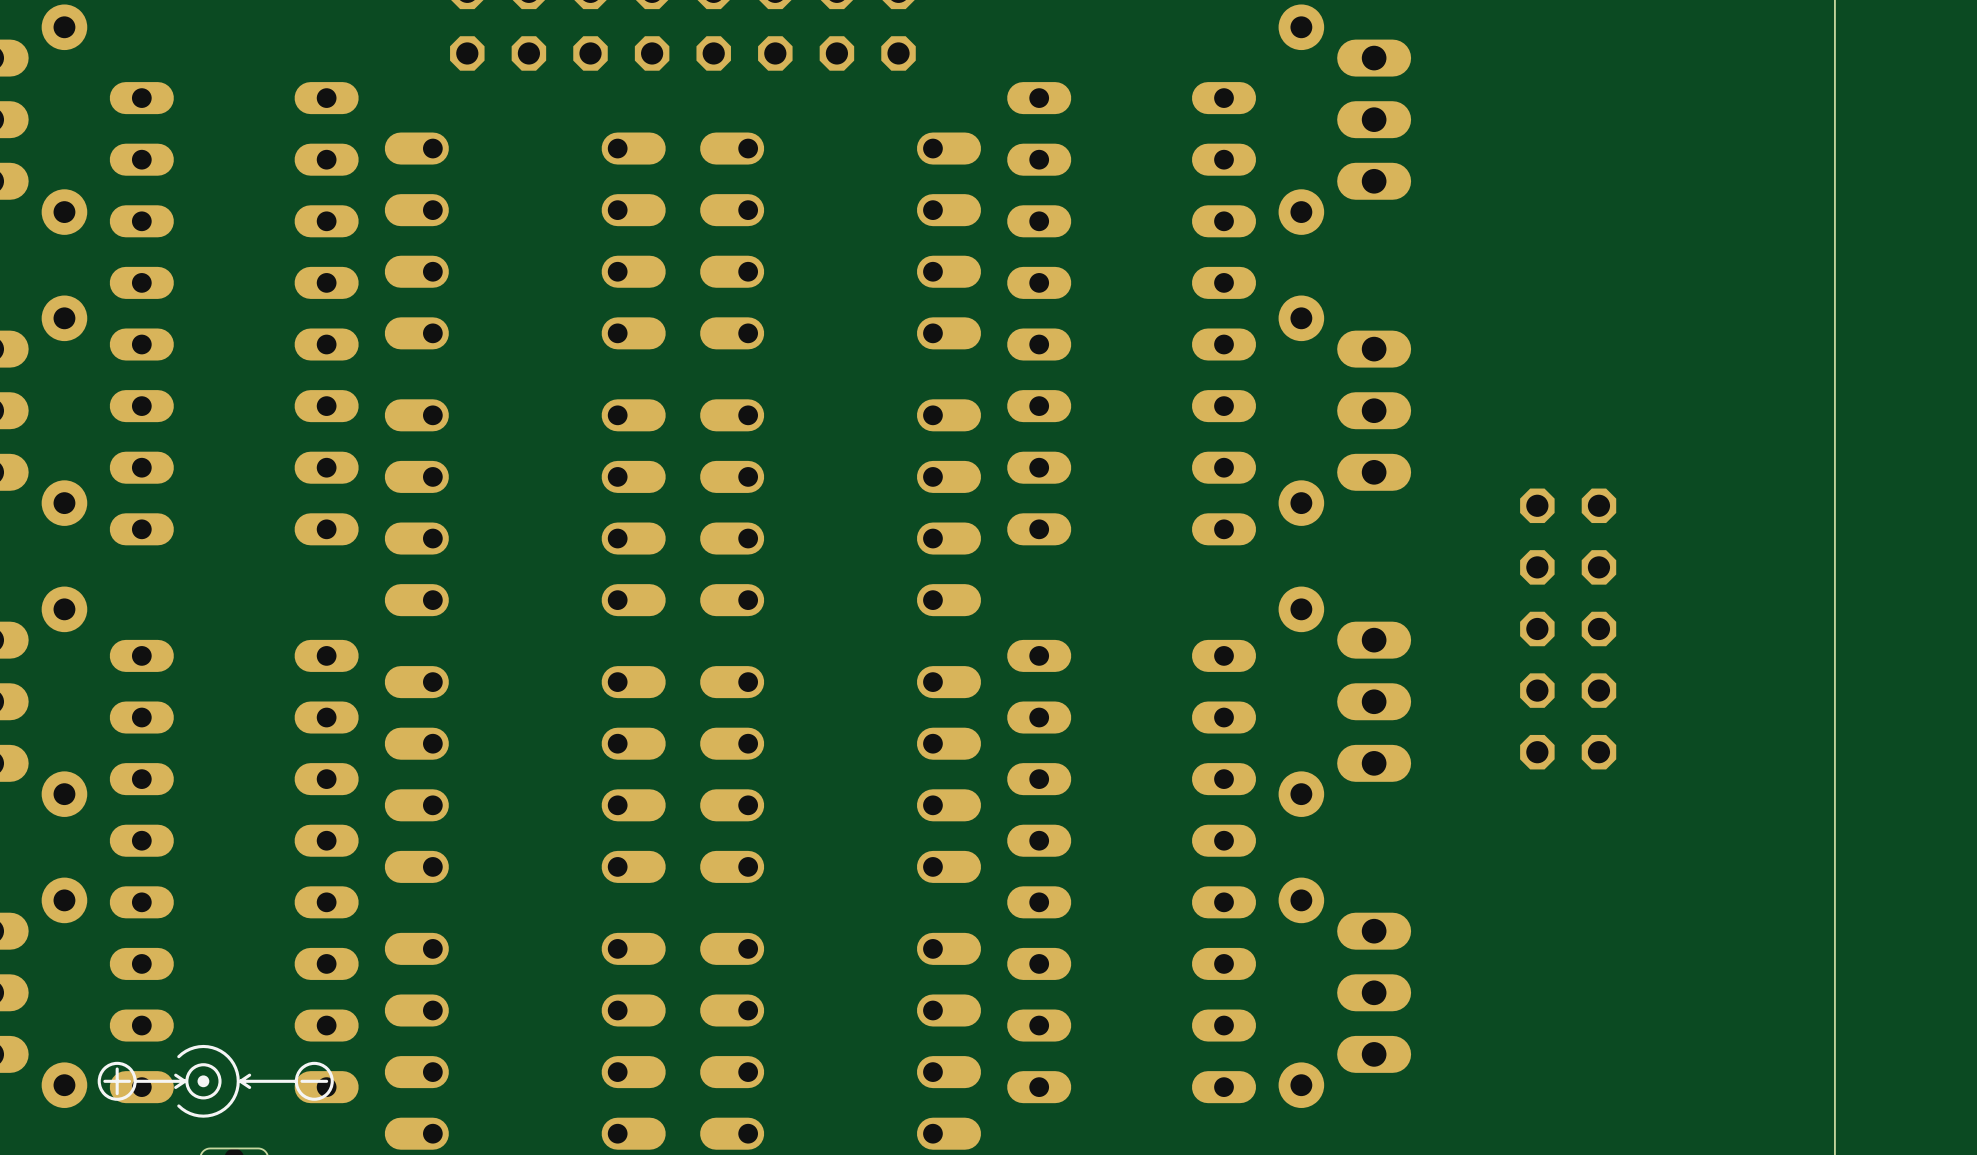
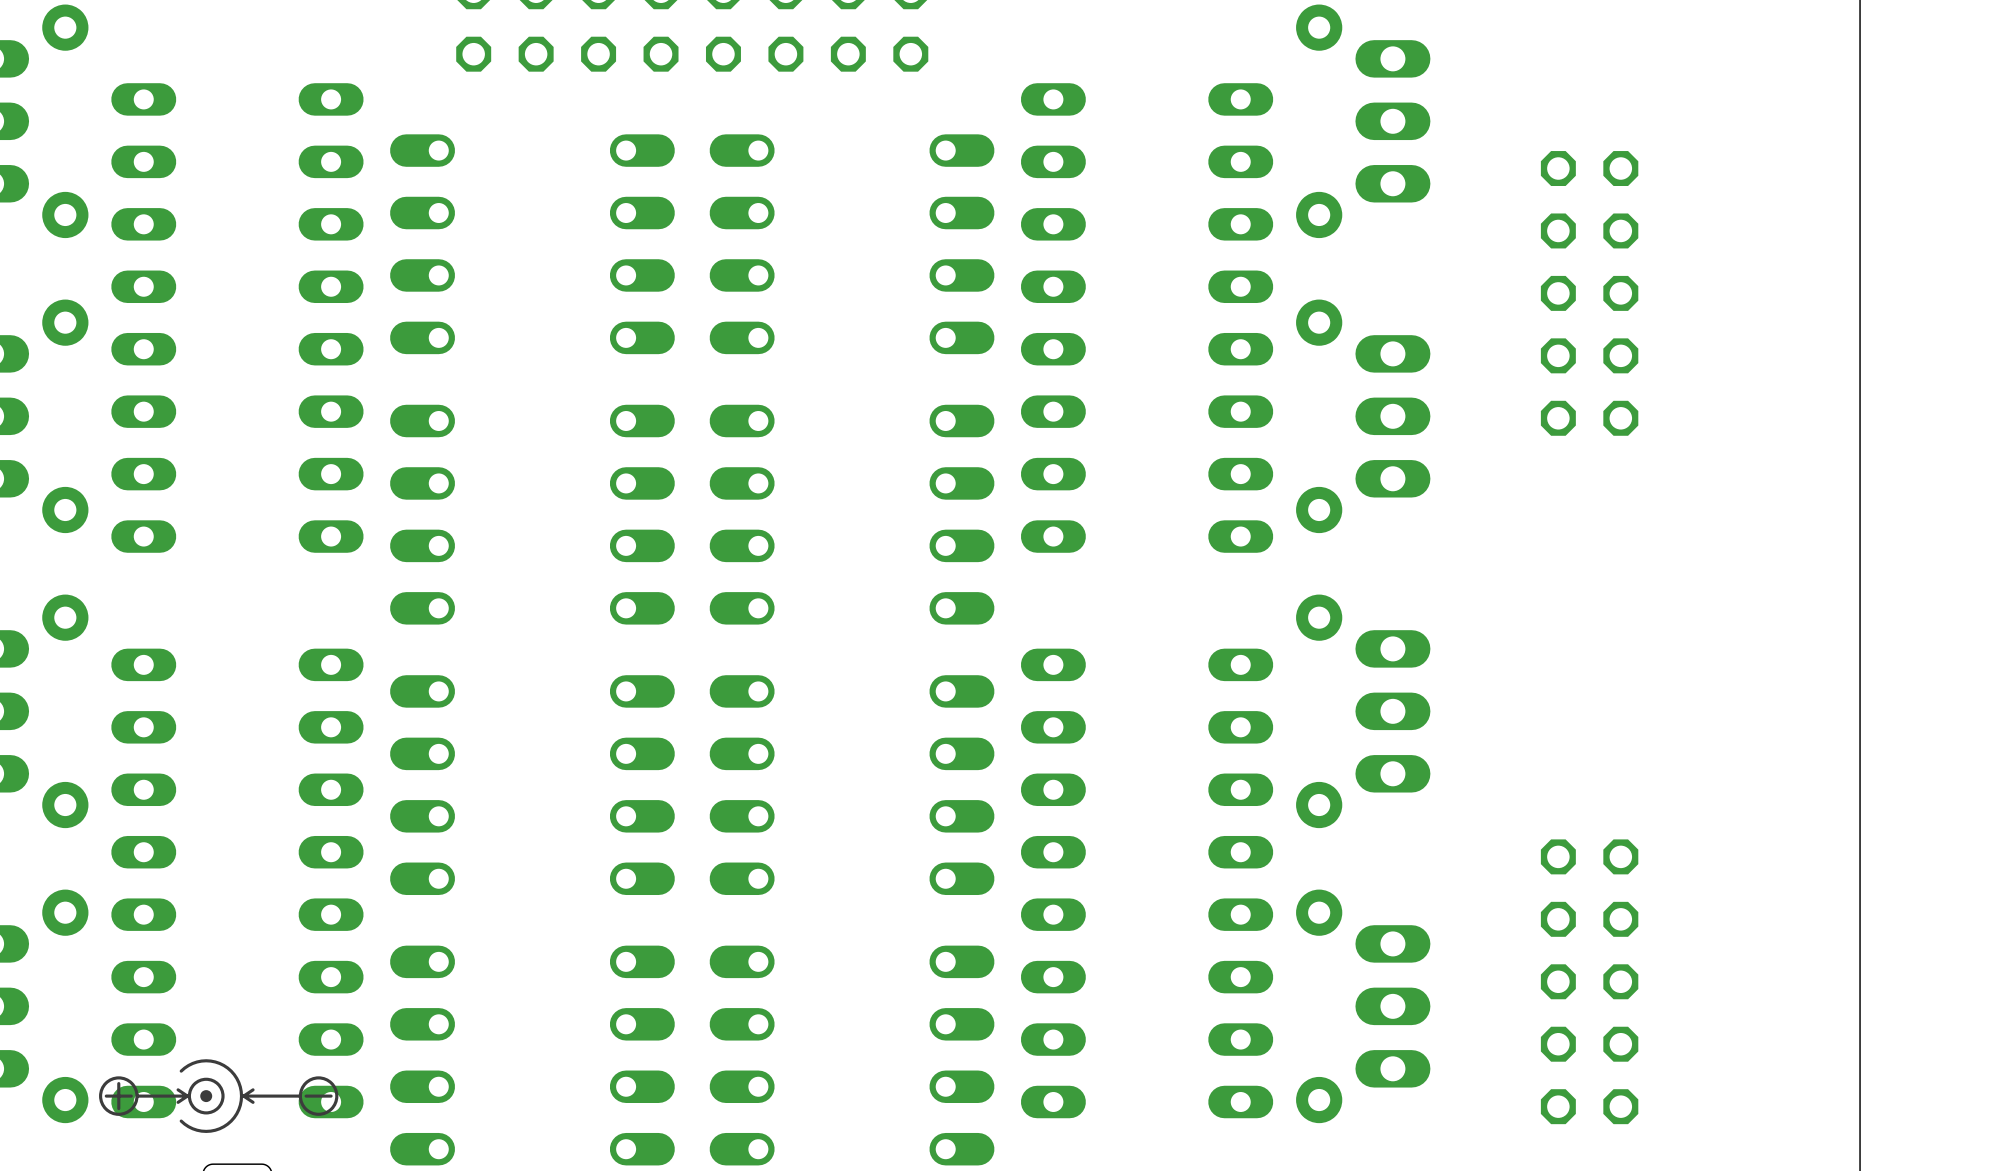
part: none -> (1589, 293)
part: (1568, 628) -> none
part: none -> (1589, 981)

